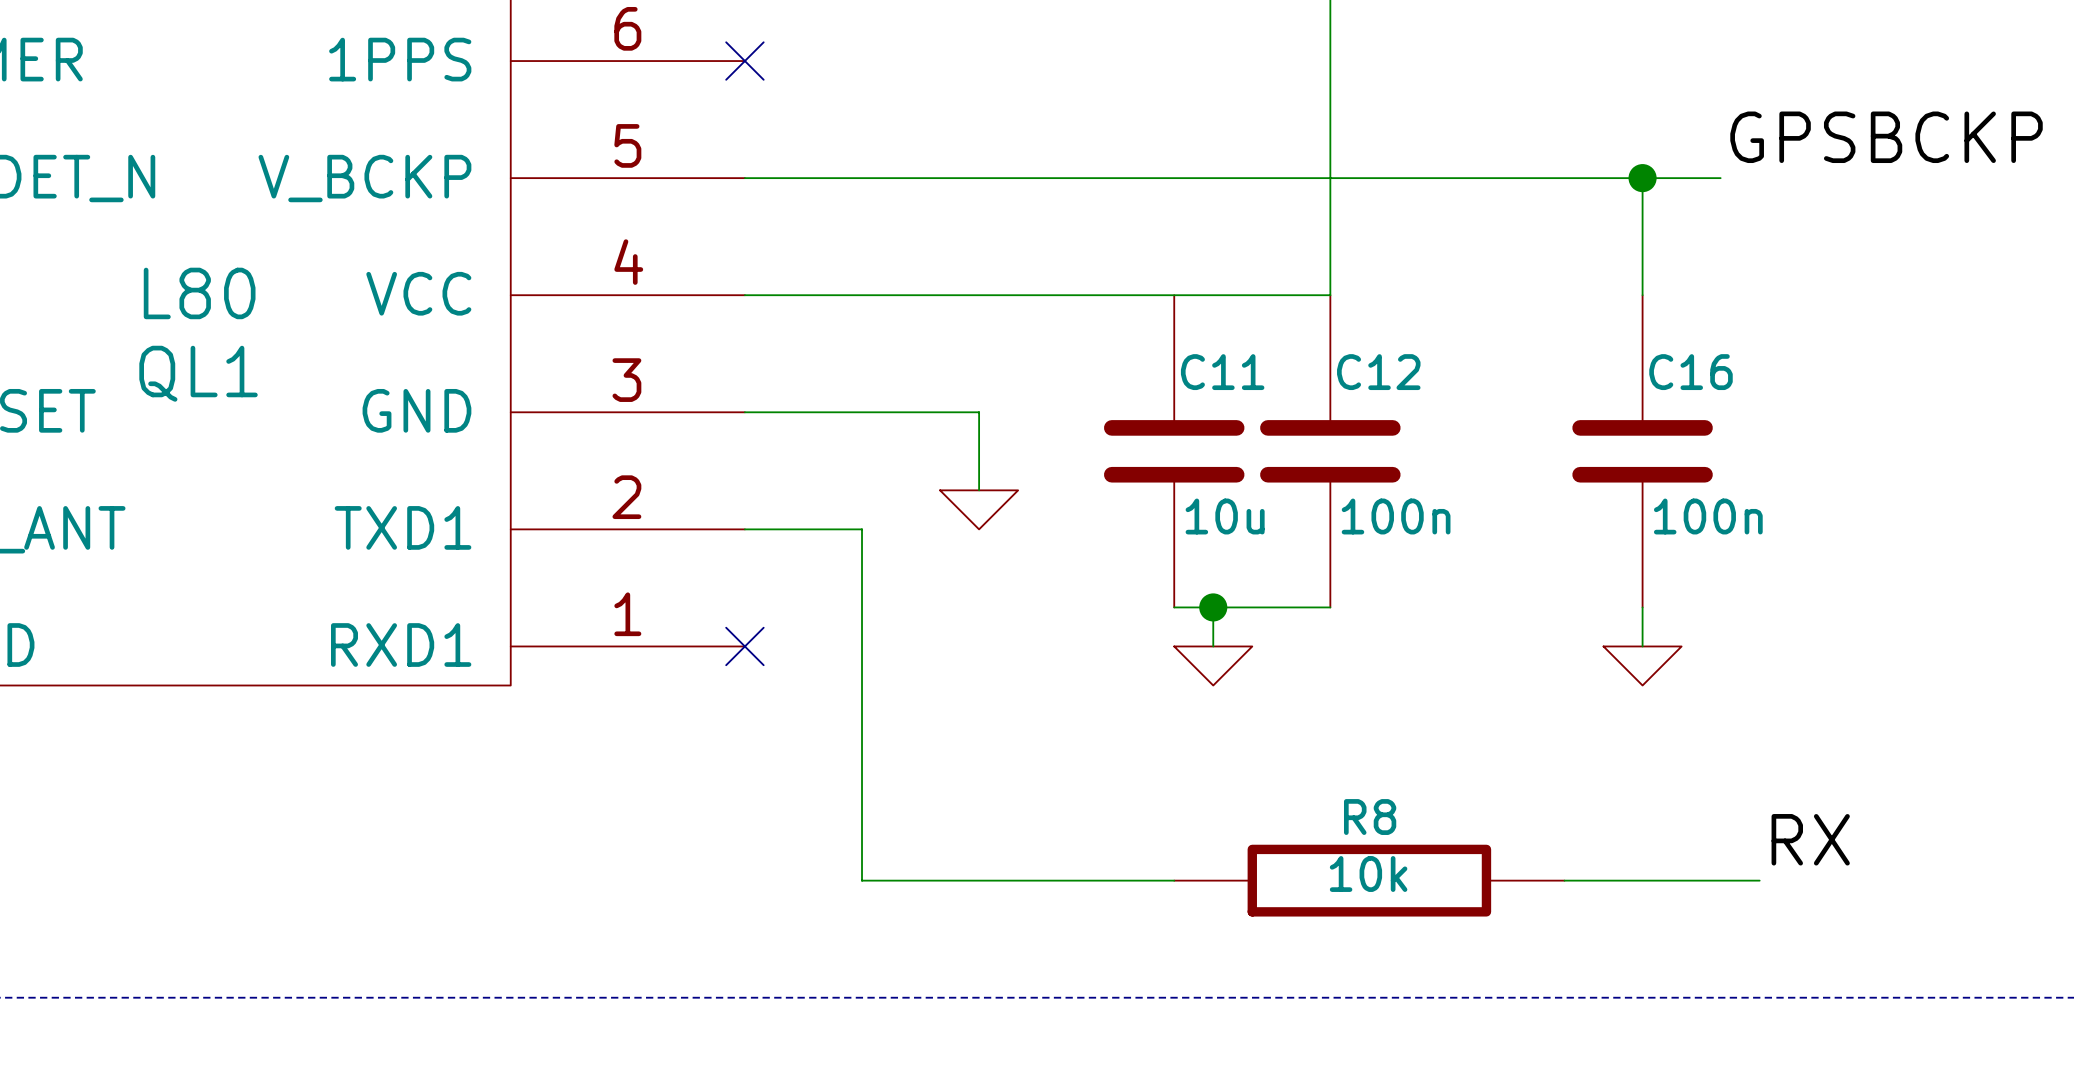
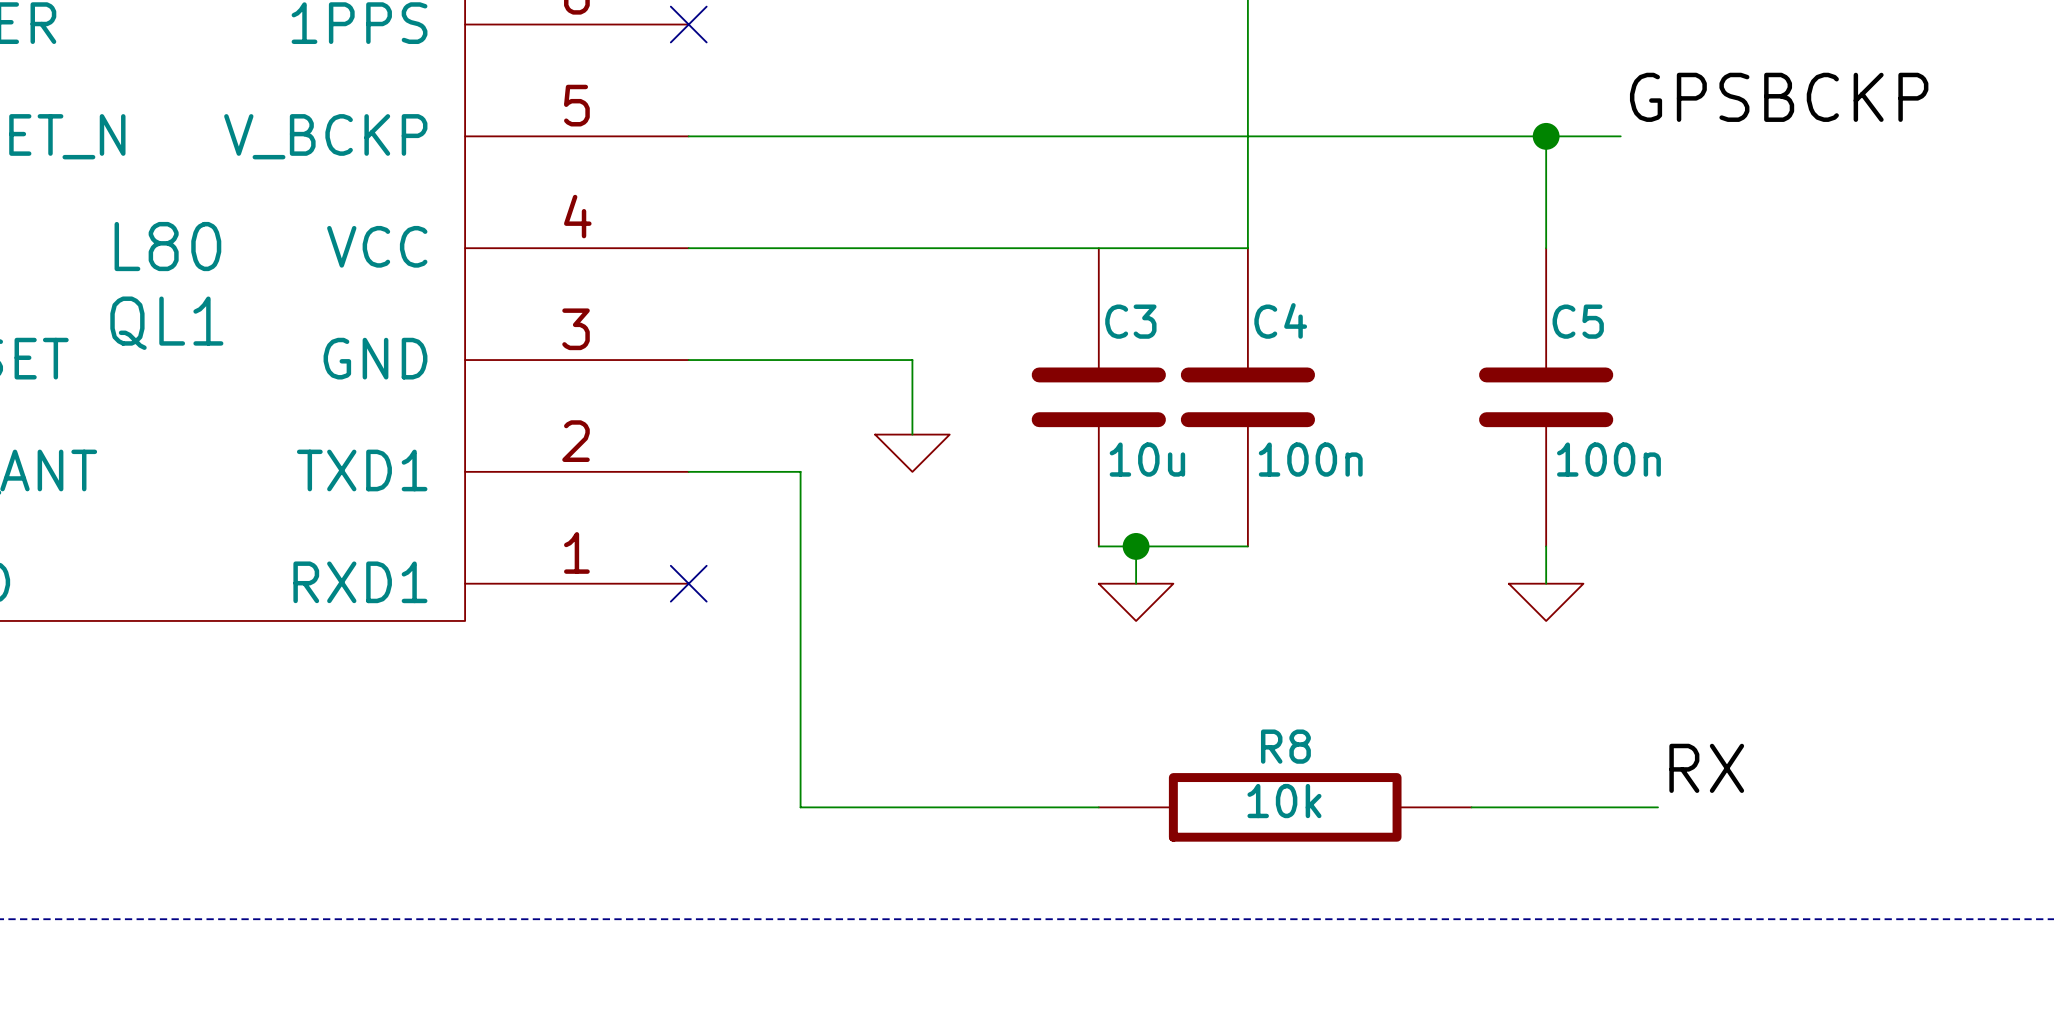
C11 name: C11 (1222, 372) -> C3 (1130, 321)
C12 name: C12 (1378, 372) -> C4 (1280, 320)
C16 name: C16 (1691, 372) -> C5 (1578, 321)

